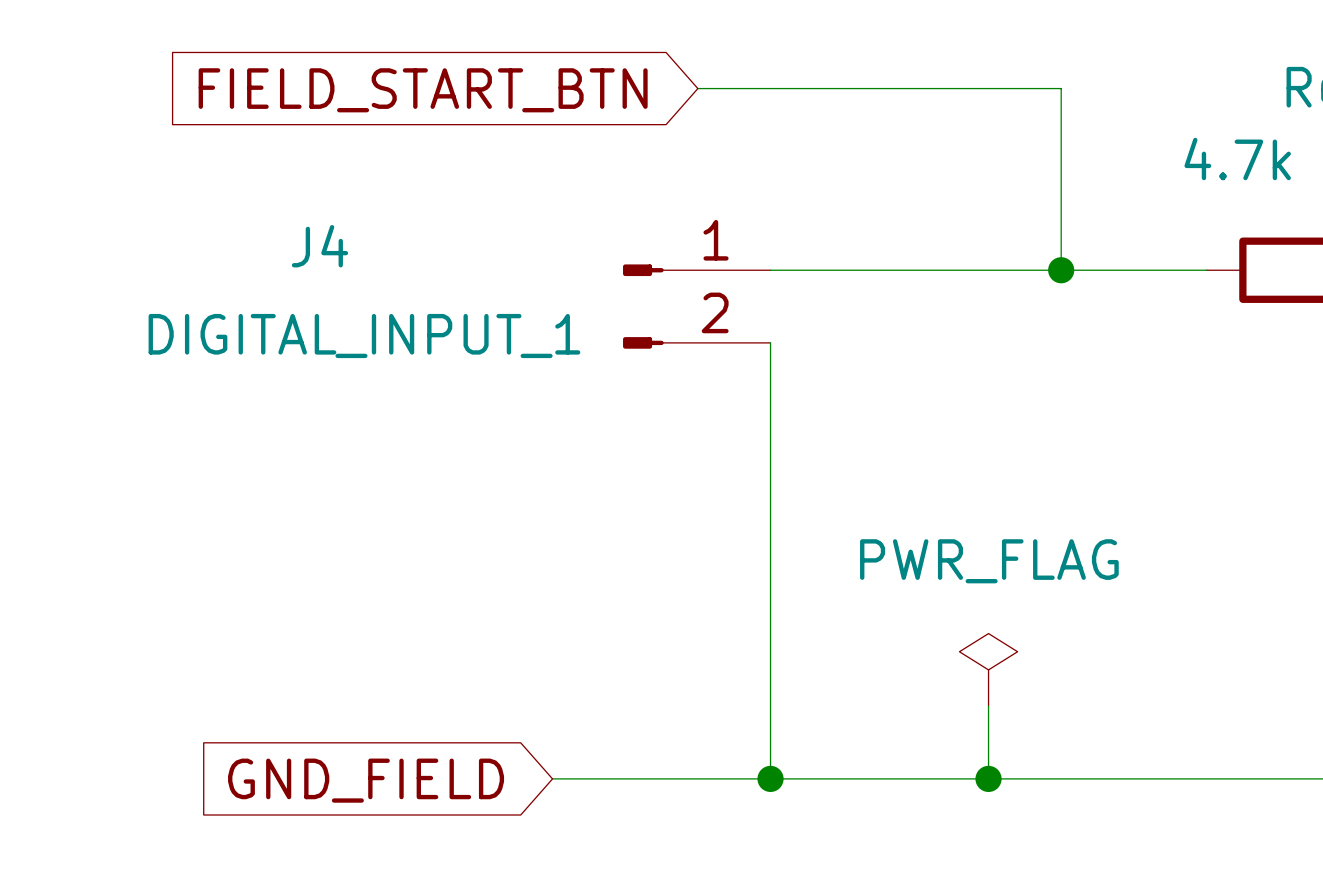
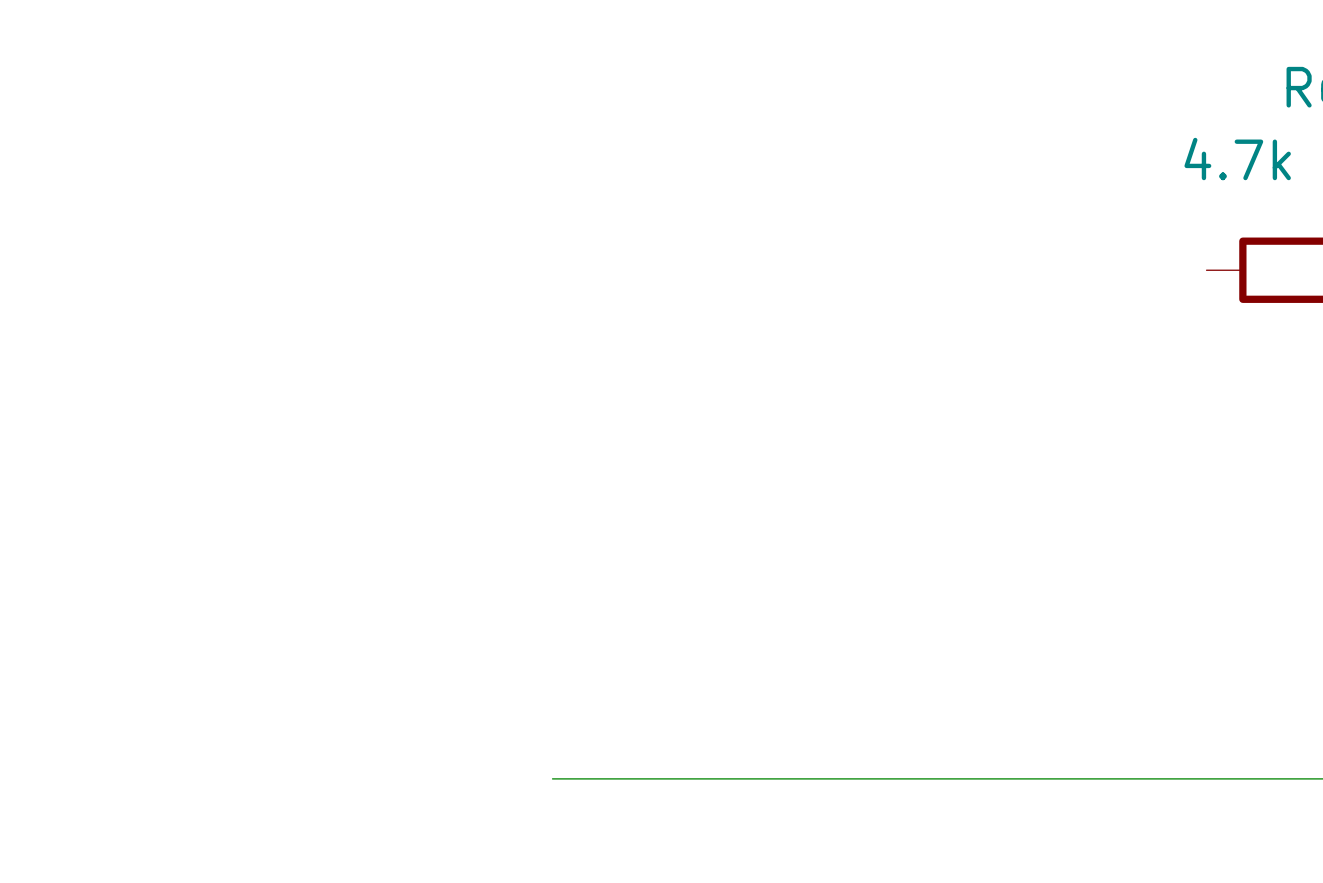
wire: (697, 88) (1061, 88) (1061, 270) -> none
global label: FIELD_START_BTN (423, 90) -> none
wire: (770, 270) (1206, 270) -> none
junction: (1061, 270) -> none
J4: DIGITAL_INPUT_1 (696, 306) -> none
wire: (770, 342) (770, 778) -> none
power symbol: PWR_FLAG (988, 669) -> none
wire: (988, 706) (988, 778) -> none
junction: (770, 778) -> none
junction: (988, 778) -> none
global label: GND_FIELD (366, 780) -> none

